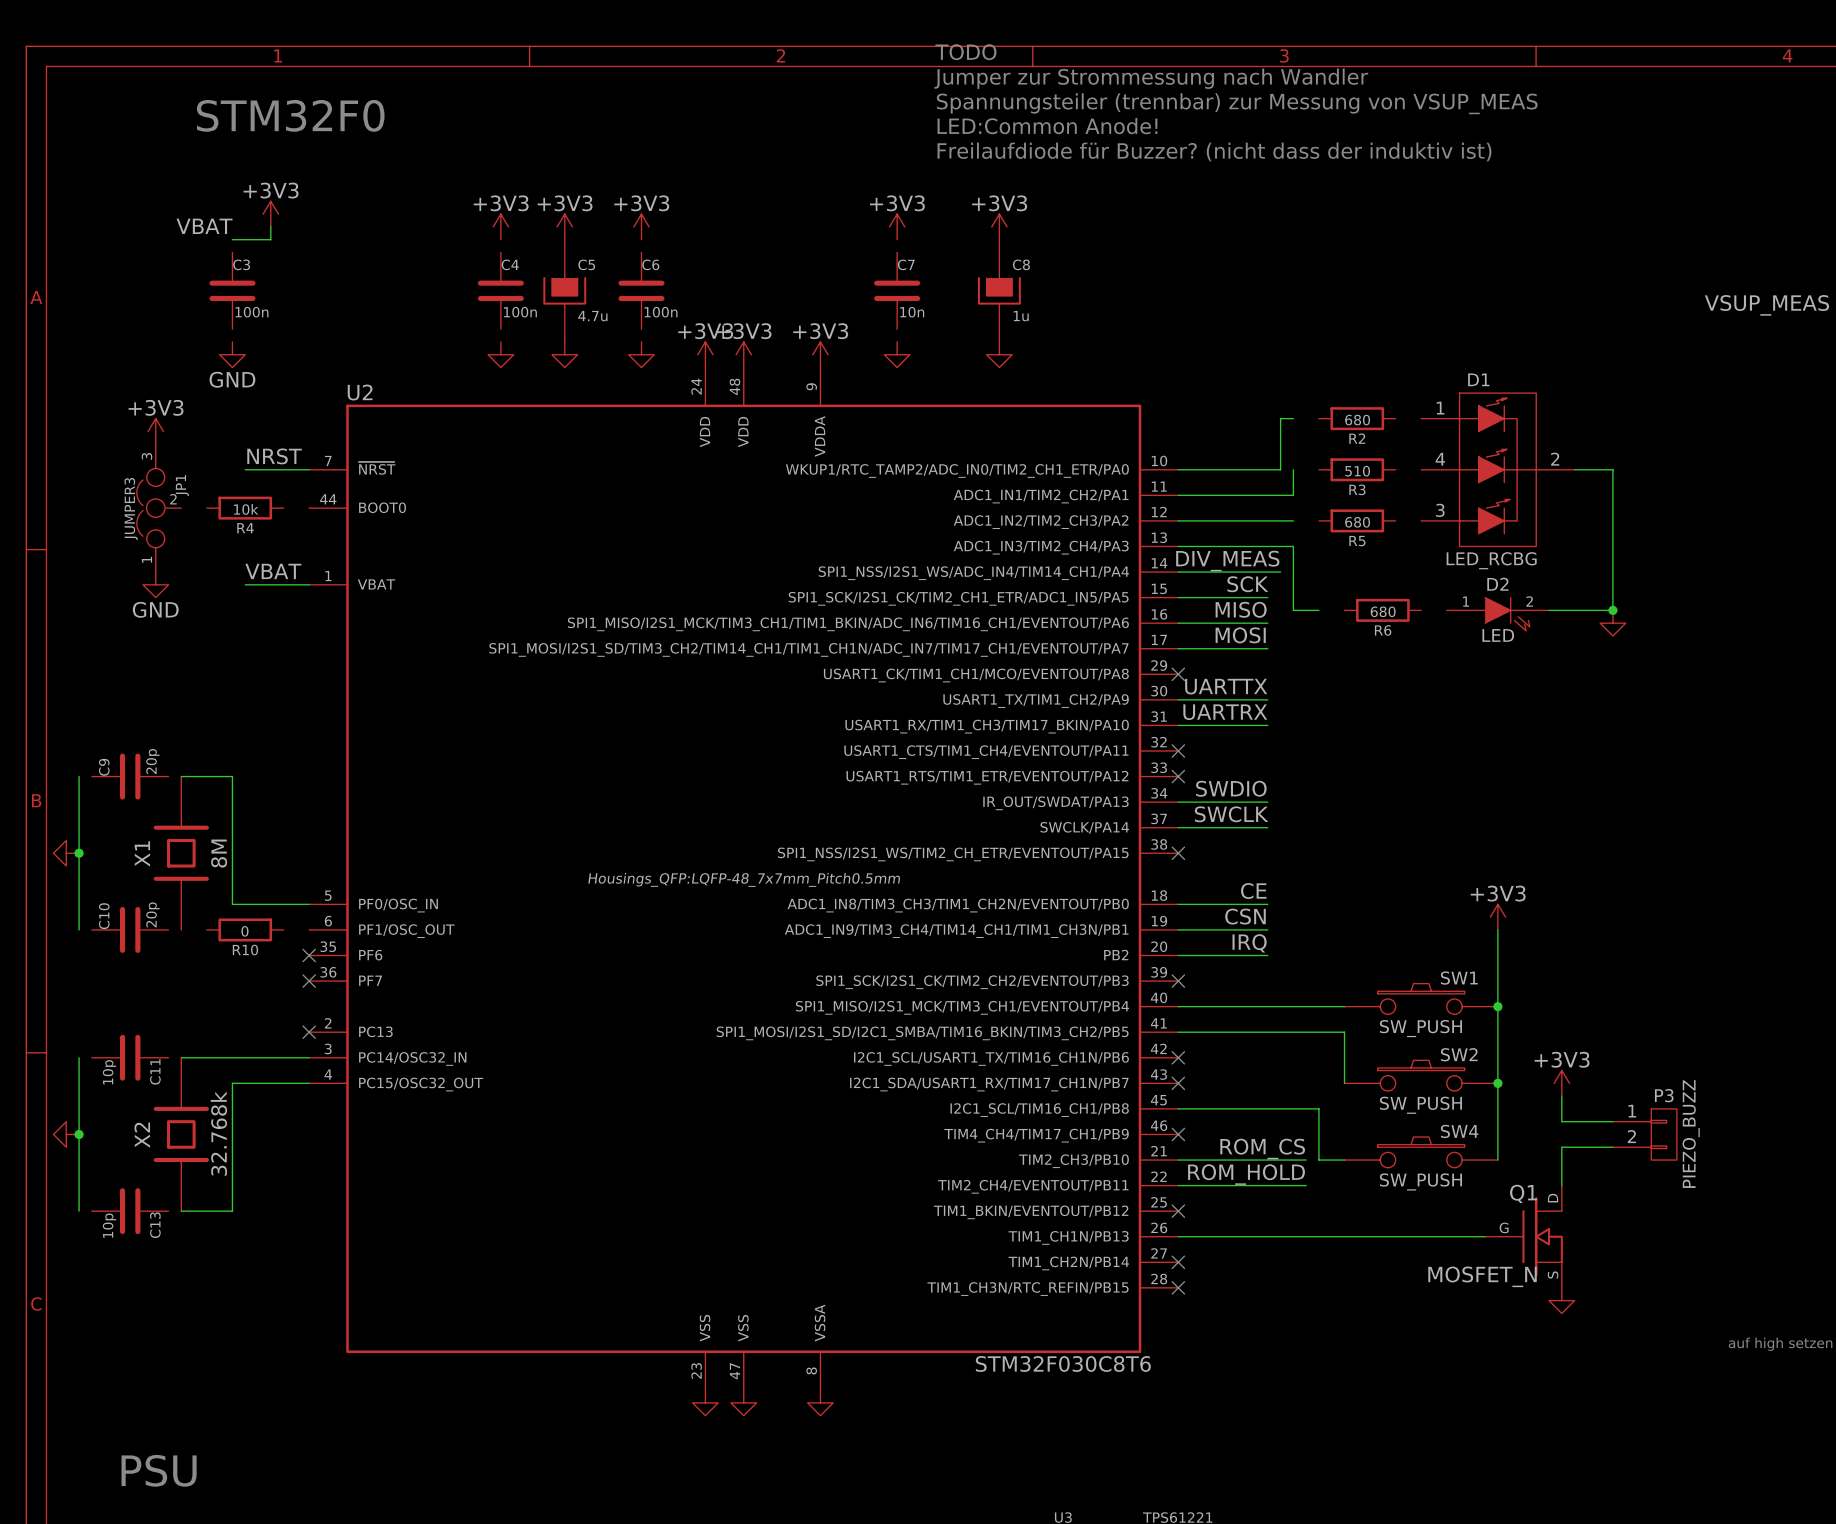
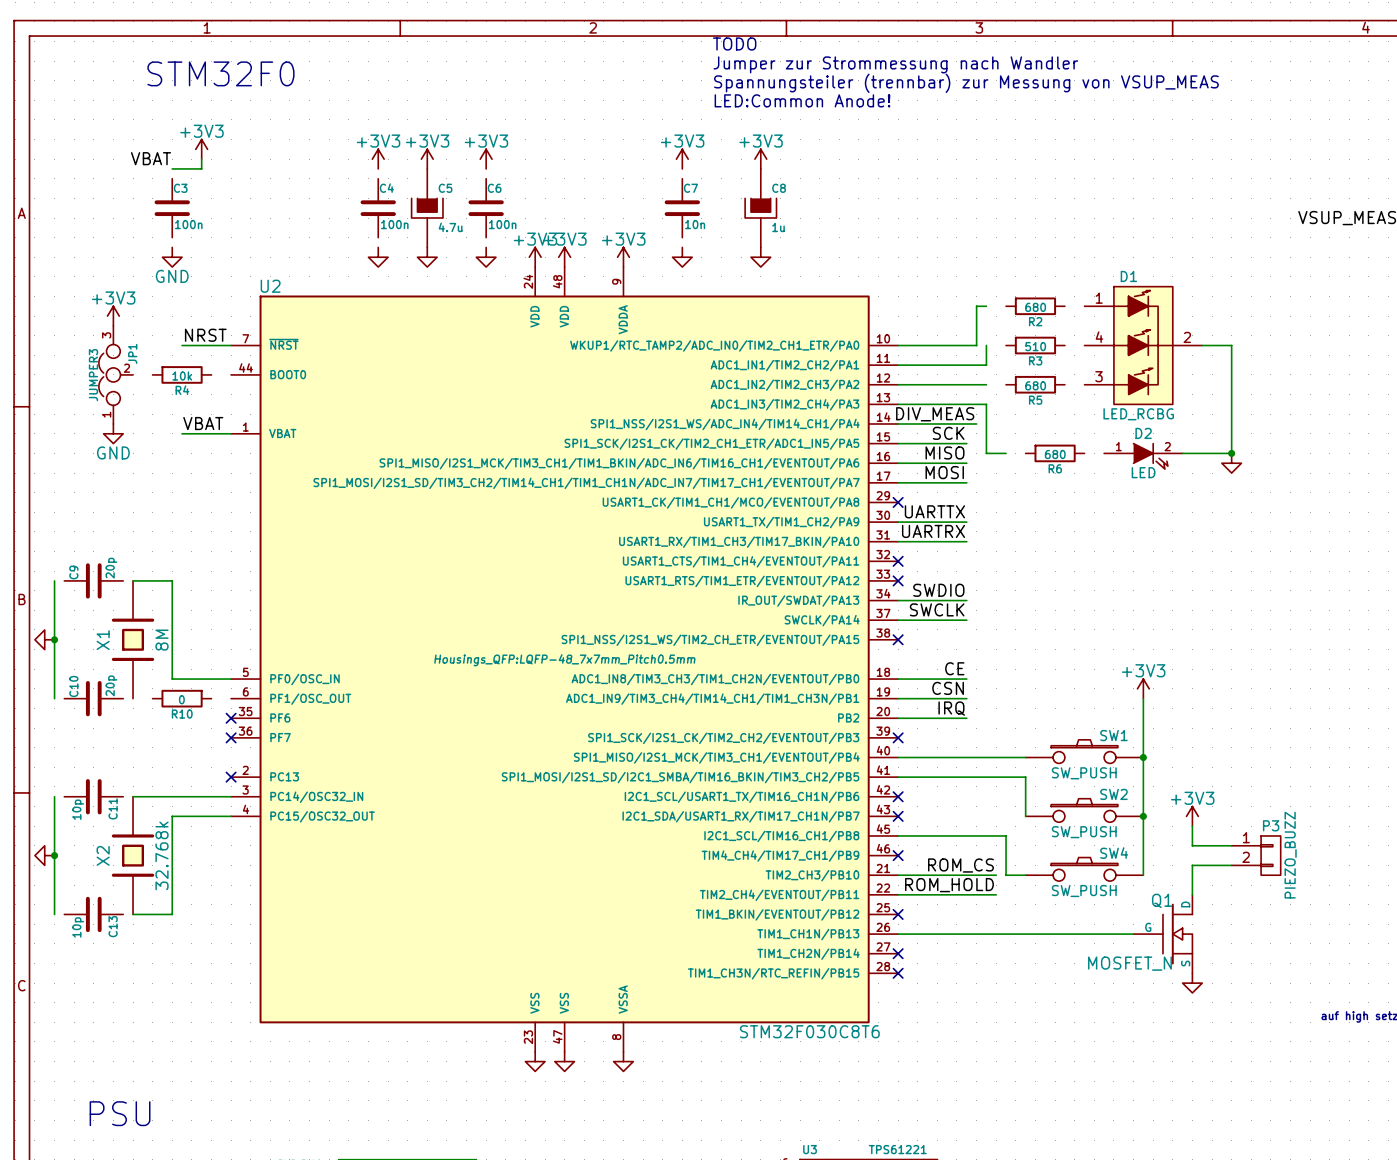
text: TODO (965, 52) -> none
text: Jumper zur Strommessung nach Wandler (1151, 78) -> TODO (734, 43)
text: Spannungsteiler (trennbar) zur Messung von VSUP_MEAS (1237, 103) -> Jumper zur Strommessung nach Wandler (895, 64)
text: LED:Common Anode! (1047, 126) -> Spannungsteiler (trennbar) zur Messung von VSUP_MEAS (966, 83)
text: Freilaufdiode für Buzzer? (nicht dass der induktiv ist) (1214, 152) -> LED:Common Anode! (802, 100)

